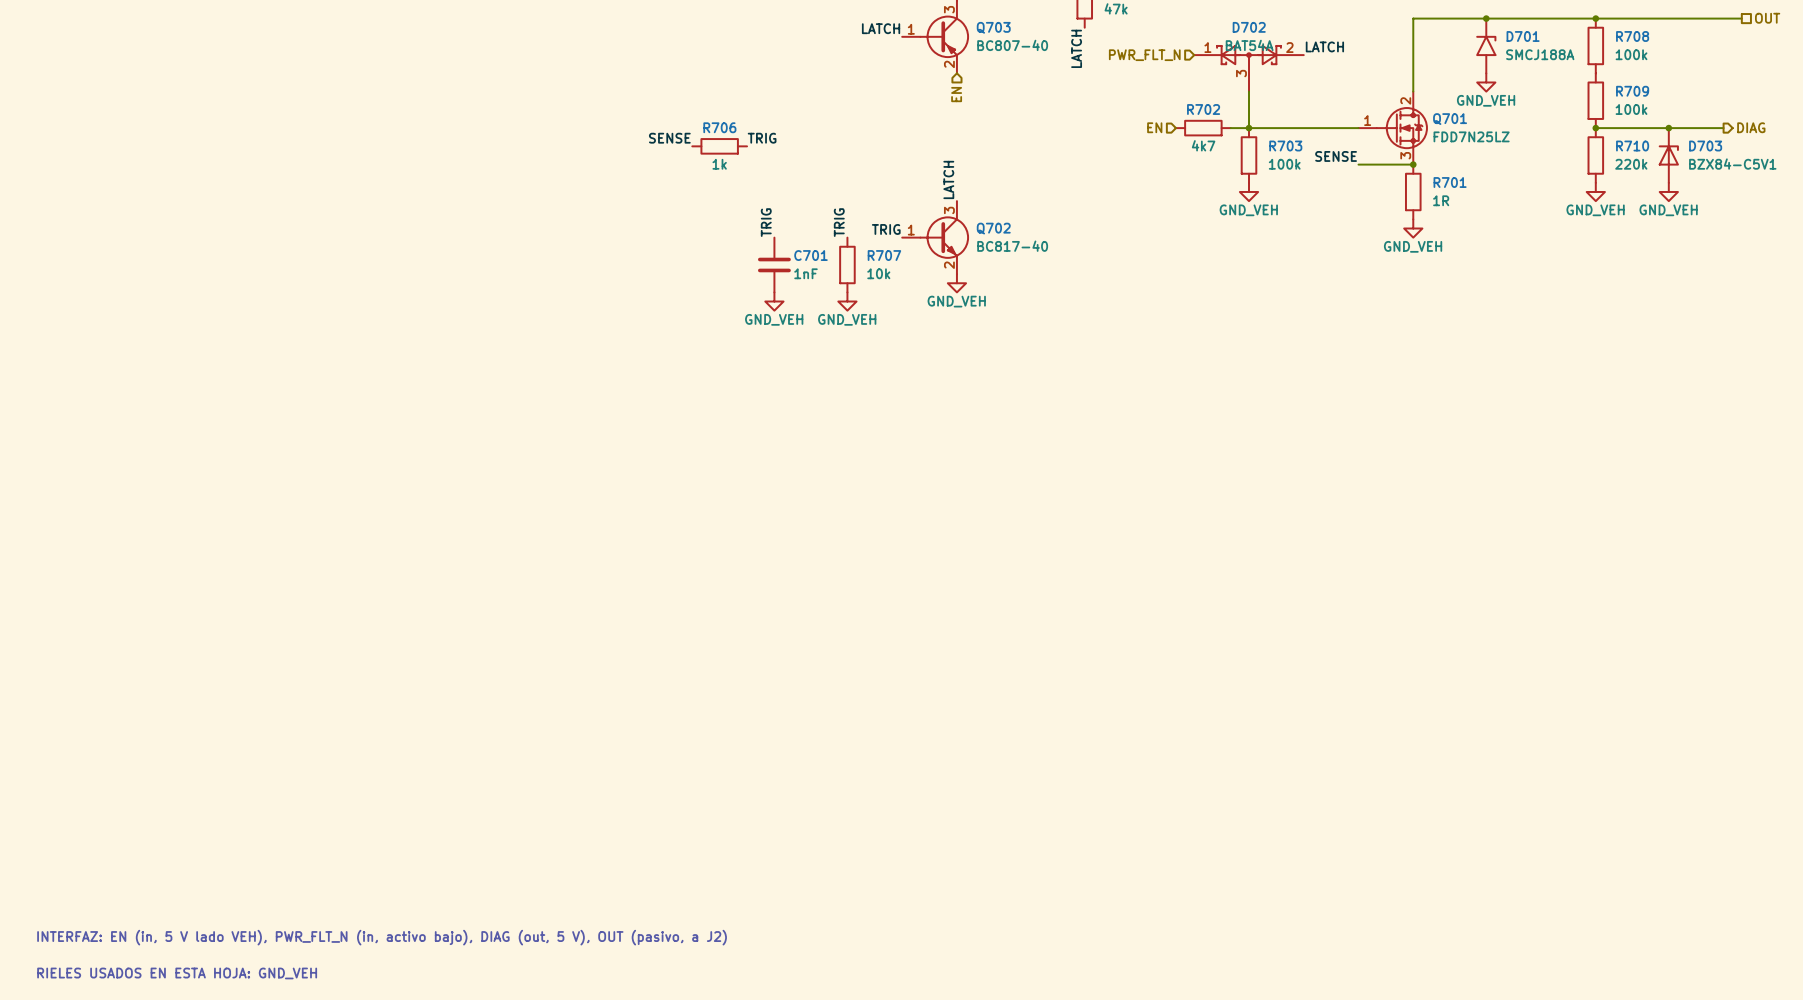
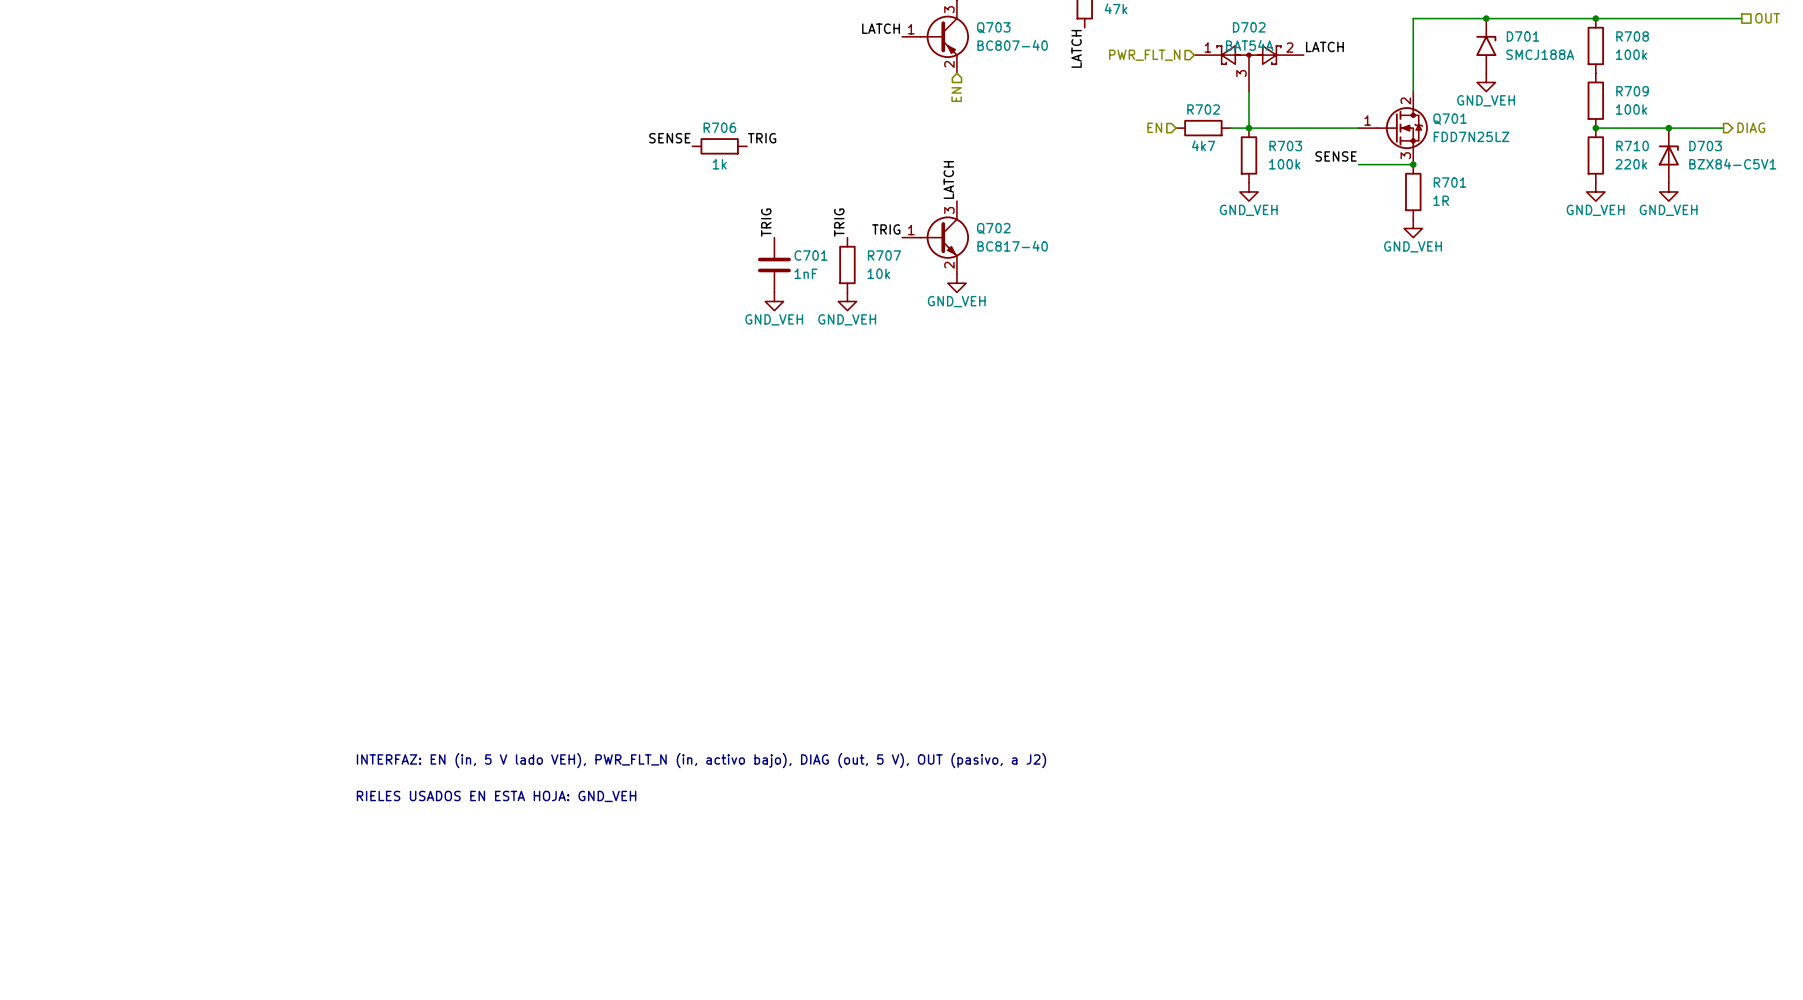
text: none -> INTERFAZ: EN (in, 5 V lado VEH), PWR_FLT_N (in, activo bajo), DIAG (out, 5 V), OUT (pasivo, a J2) (701, 760)
text: none -> RIELES USADOS EN ESTA HOJA: GND_VEH (496, 796)
text: INTERFAZ: EN (in, 5 V lado VEH), PWR_FLT_N (in, activo bajo), DIAG (out, 5 V), OUT (pasivo, a J2) (382, 937) -> none
text: RIELES USADOS EN ESTA HOJA: GND_VEH (177, 973) -> none

